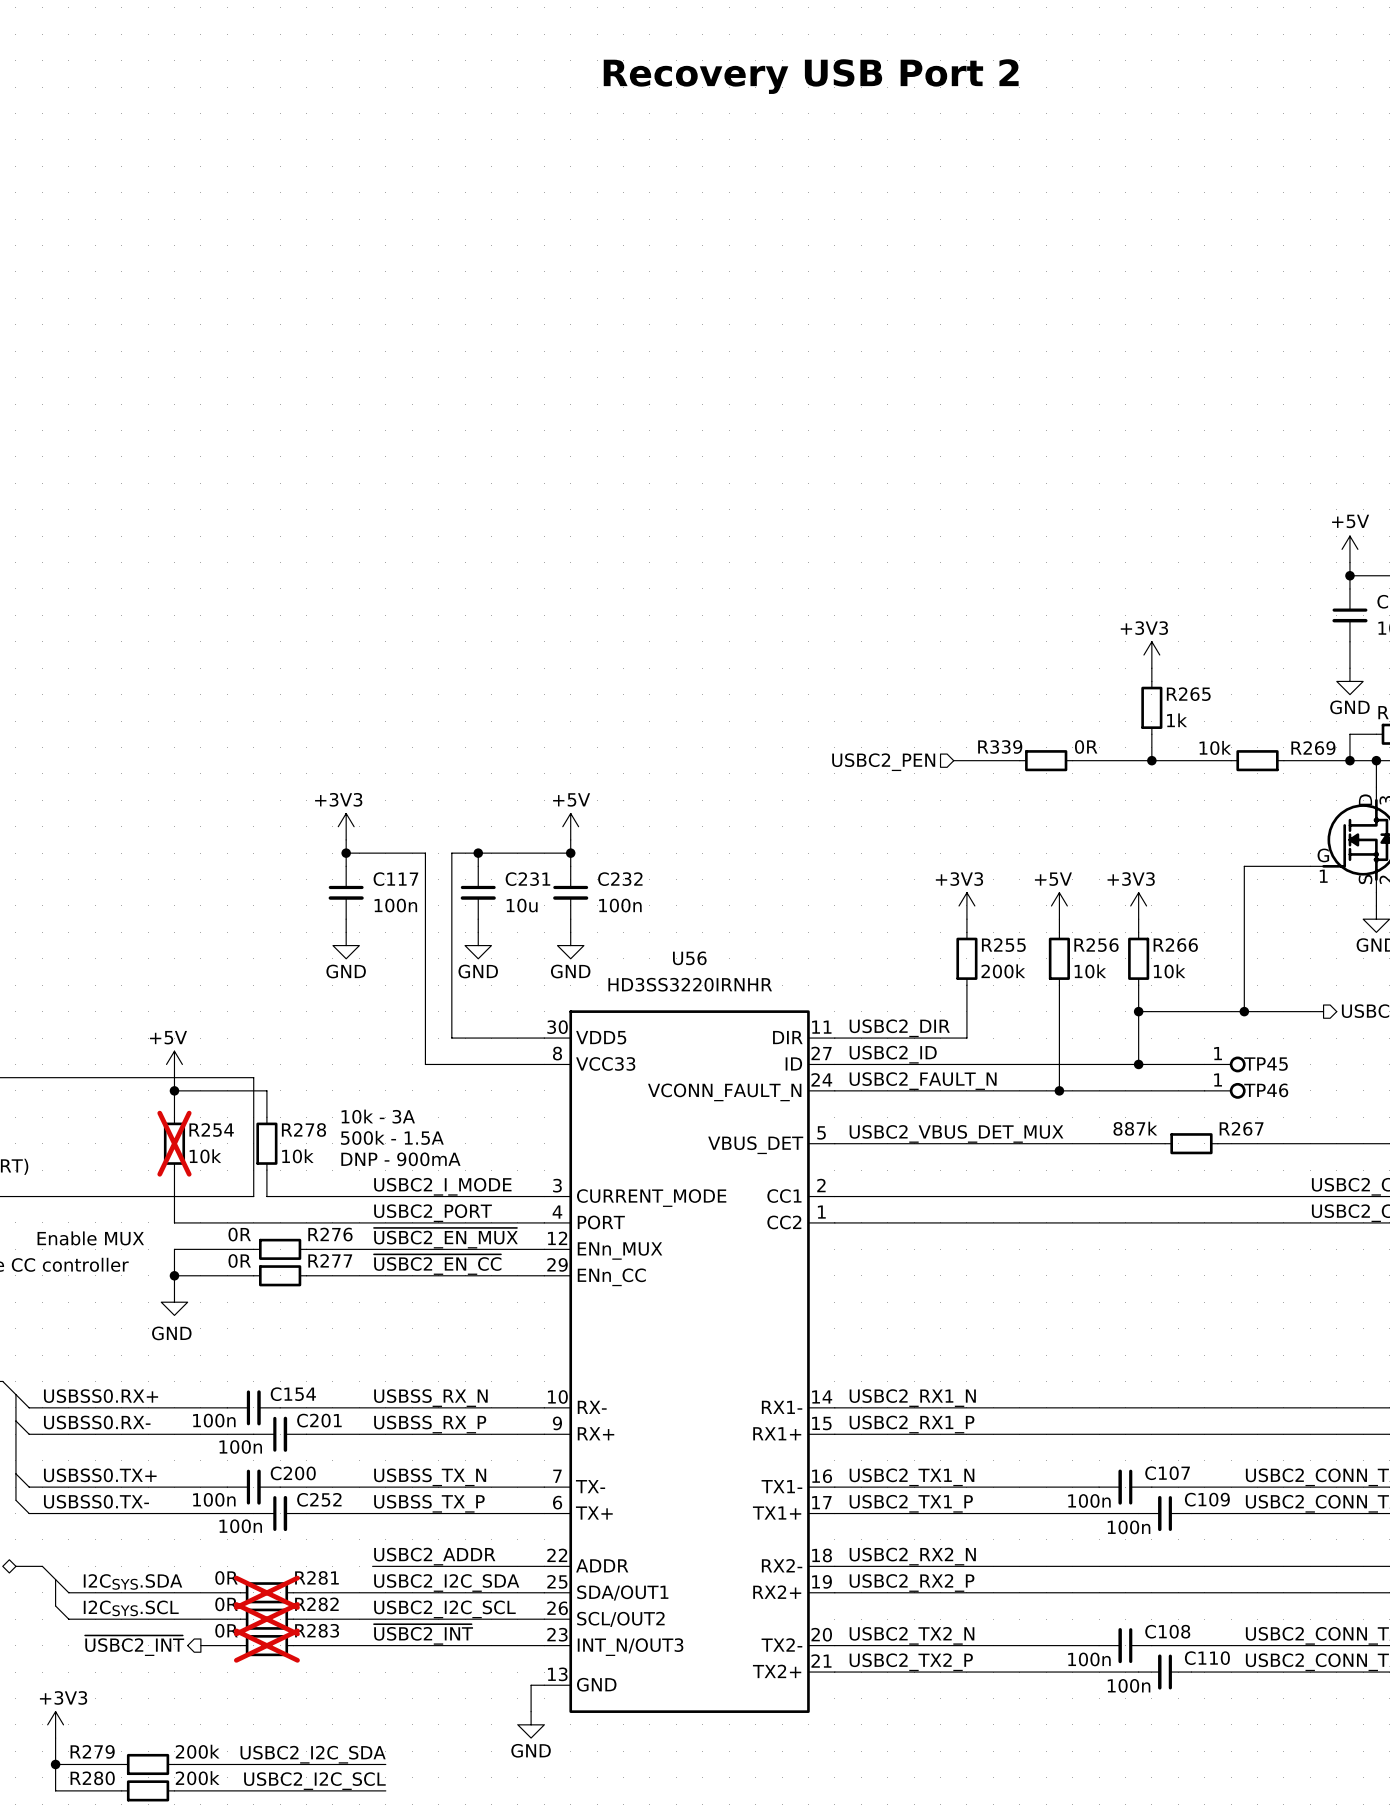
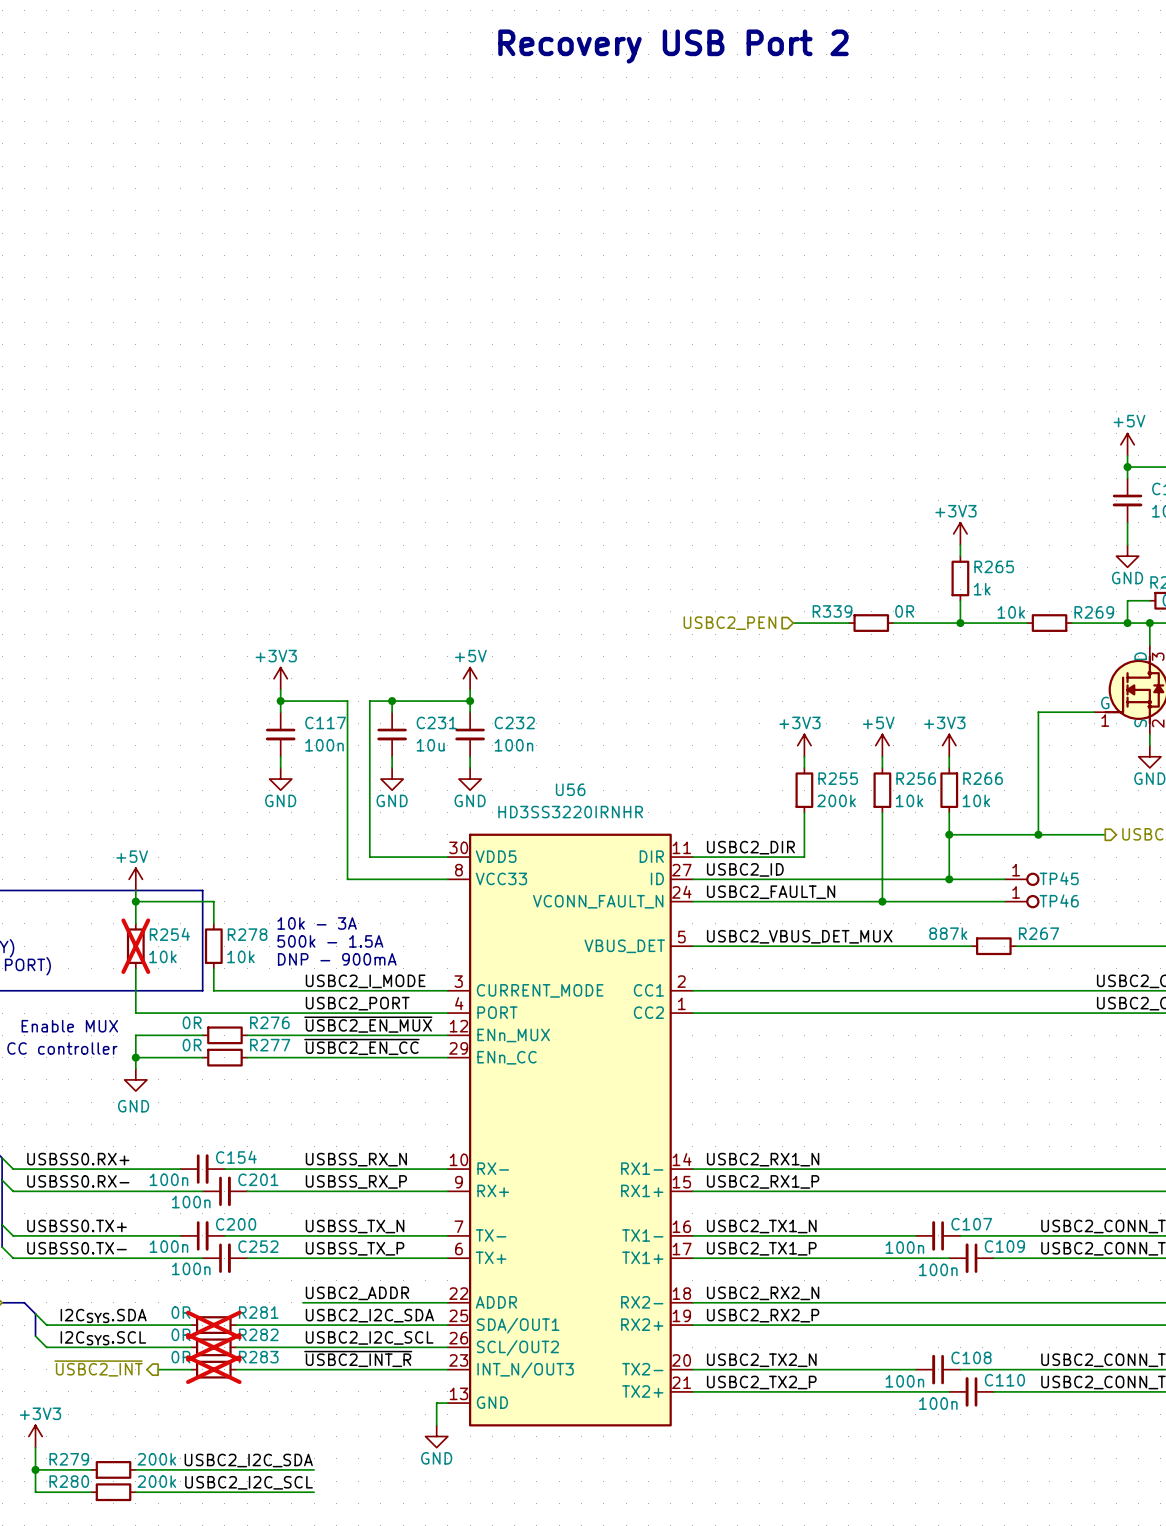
label: ~{USBC2_INT} (423, 1634) -> ~{USBC2_INT_R} (358, 1358)

